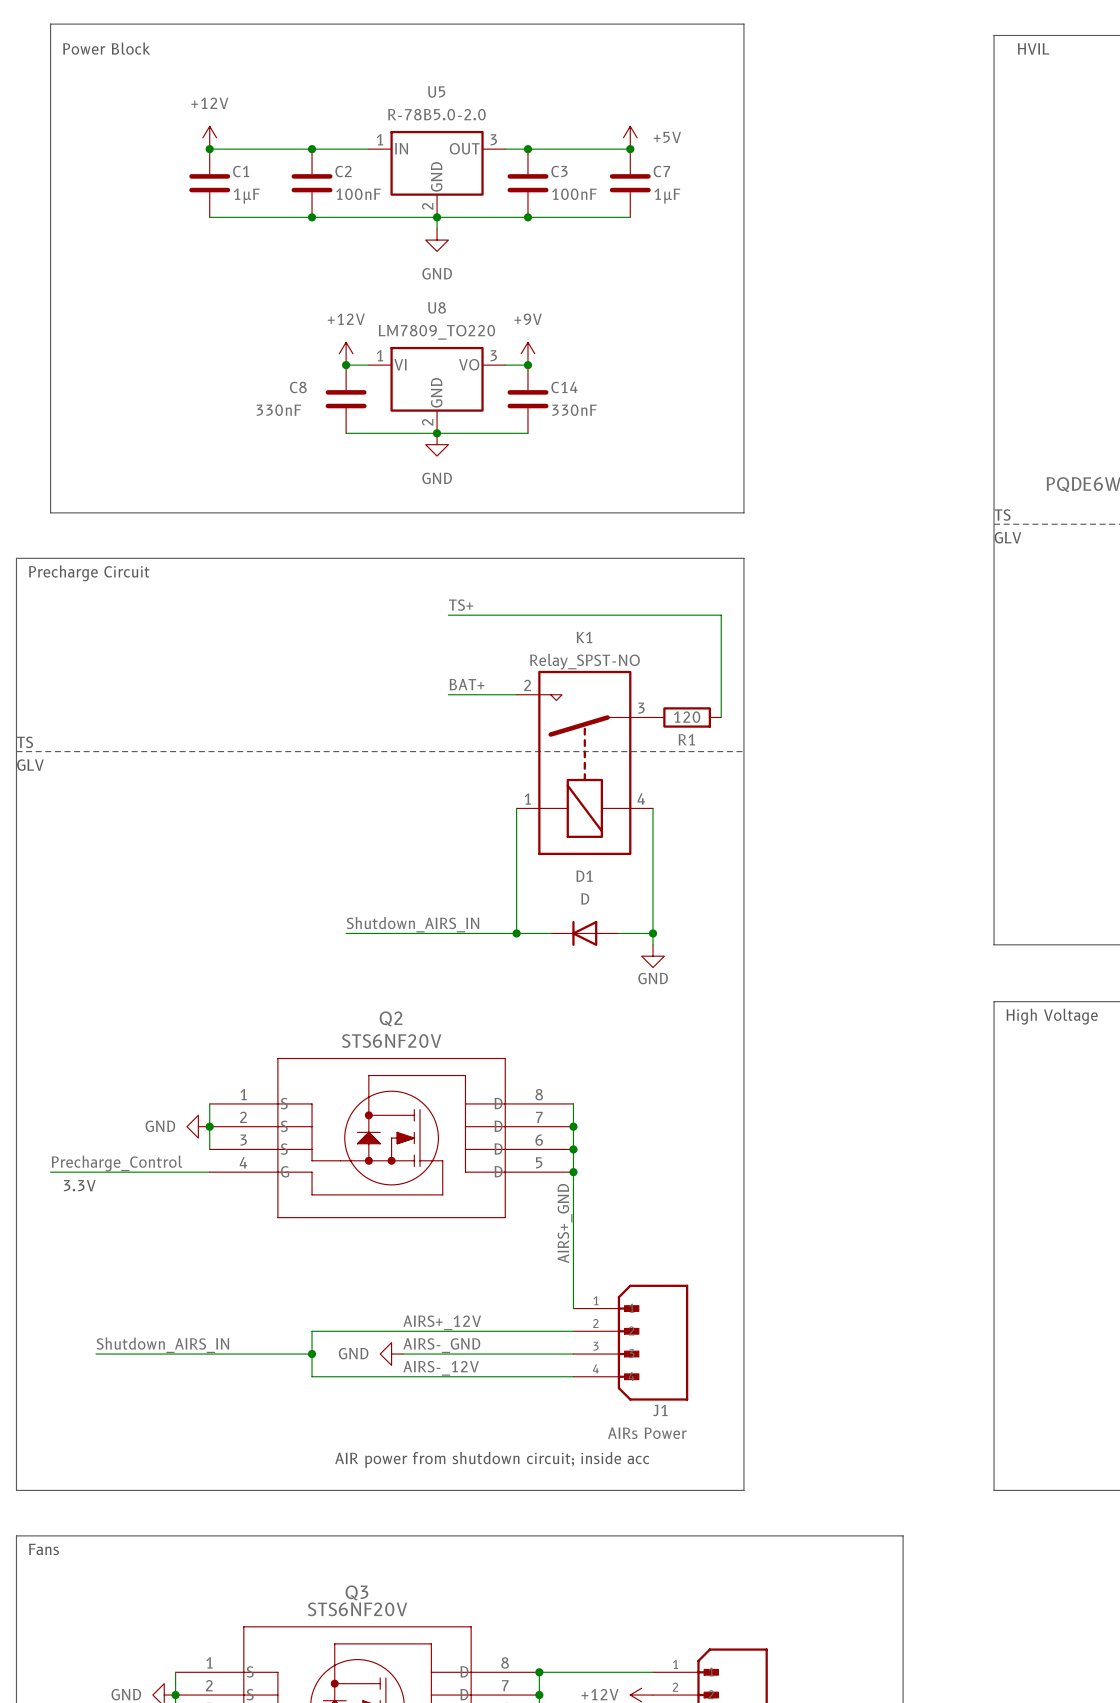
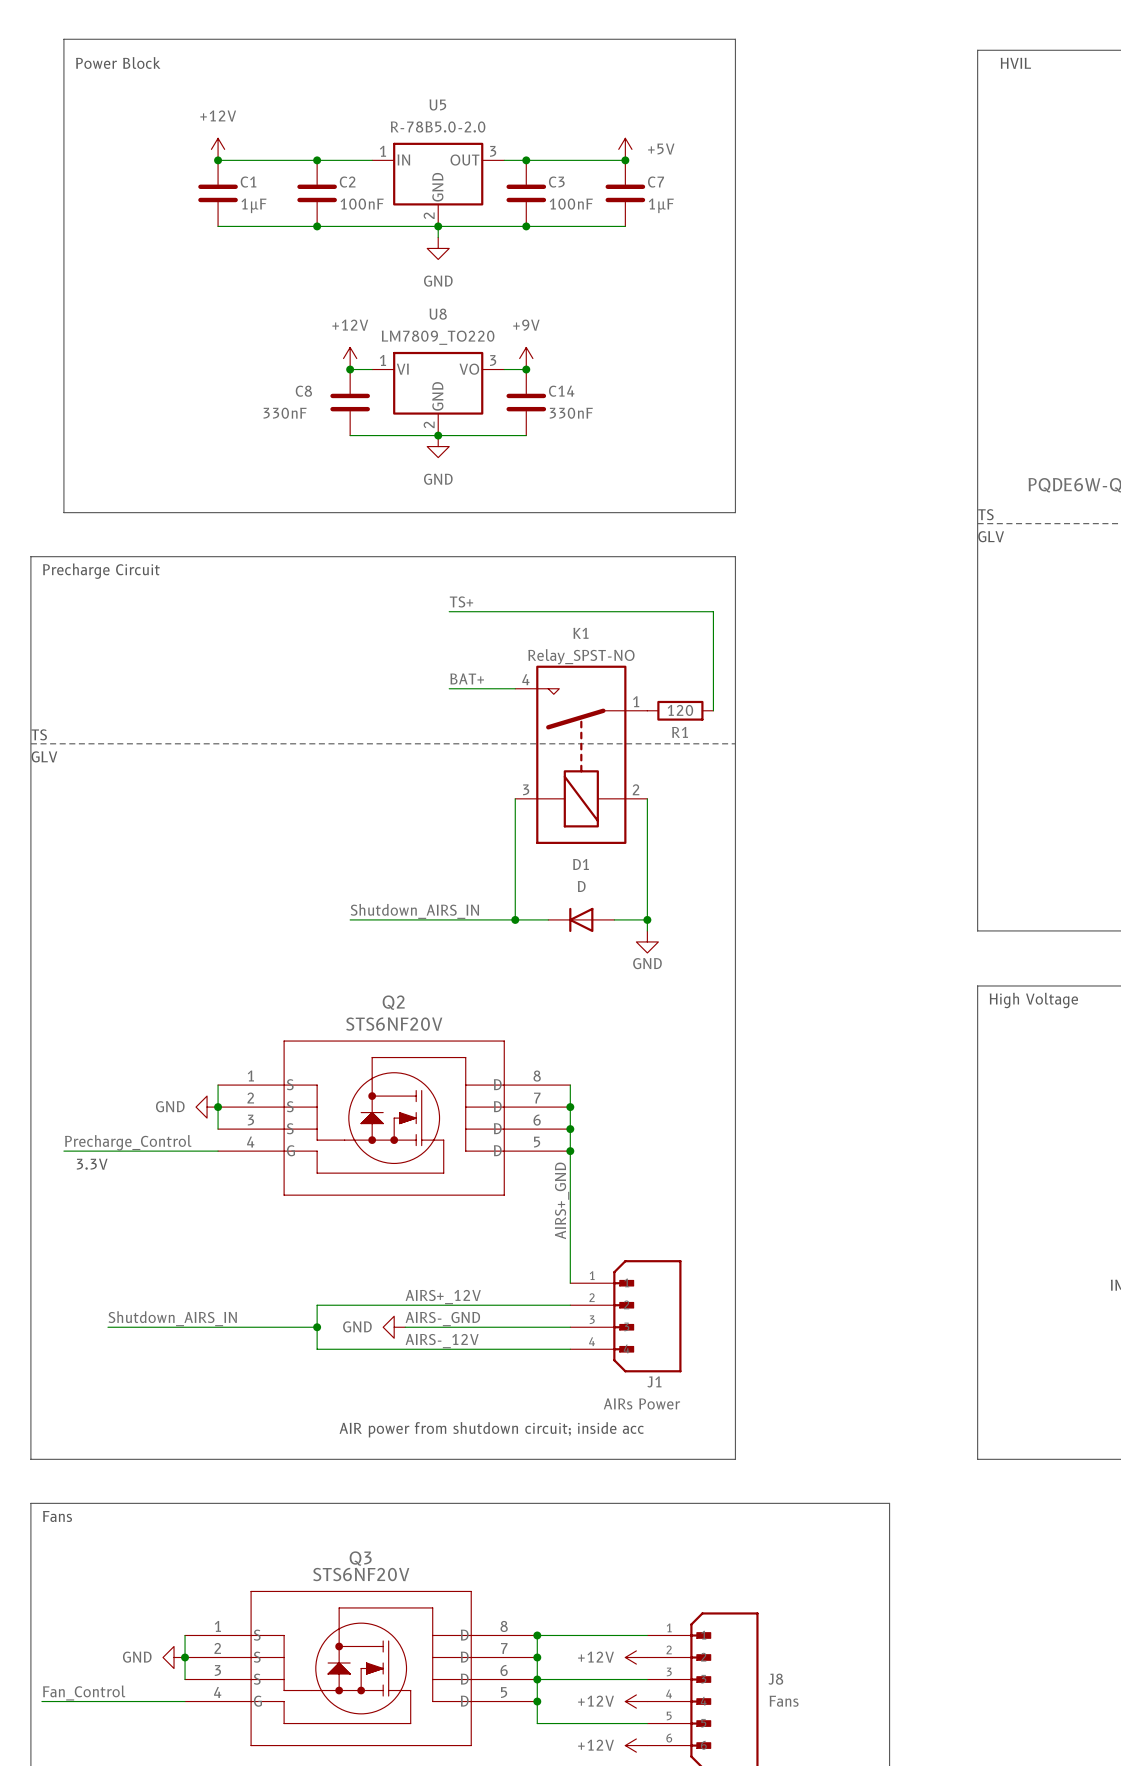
K1 pin number: 2 (527, 685) -> 4 (525, 679)
K1 pin number: 3 (641, 708) -> 1 (636, 701)
K1 pin number: 1 (527, 799) -> 3 (526, 789)
K1 pin number: 4 (641, 799) -> 2 (636, 789)

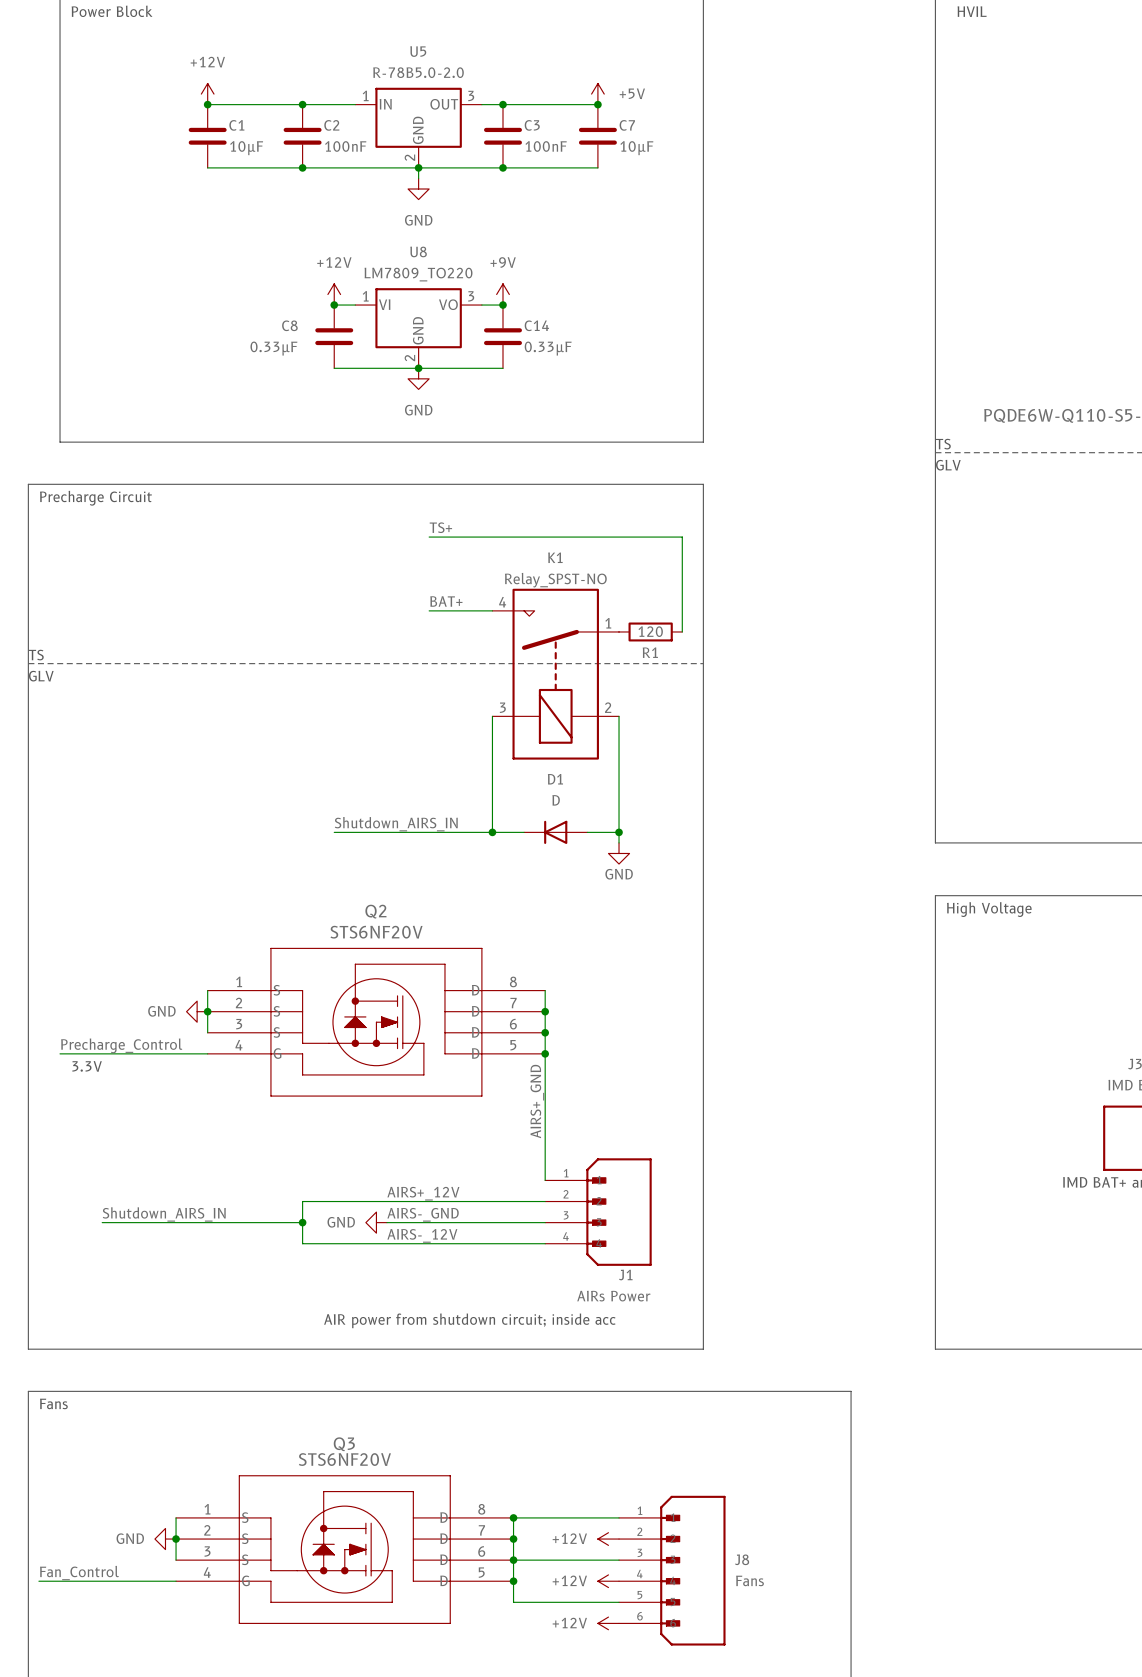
C1 value: 1µF (253, 205) -> 10µF (246, 148)
C7 value: 1µF (661, 205) -> 10µF (636, 148)
C8 value: 330nF (285, 413) -> 0.33µF (273, 348)
C14 value: 330nF (571, 413) -> 0.33µF (548, 348)

